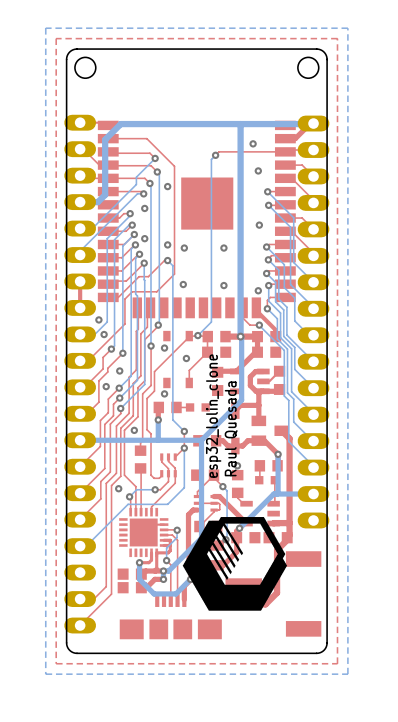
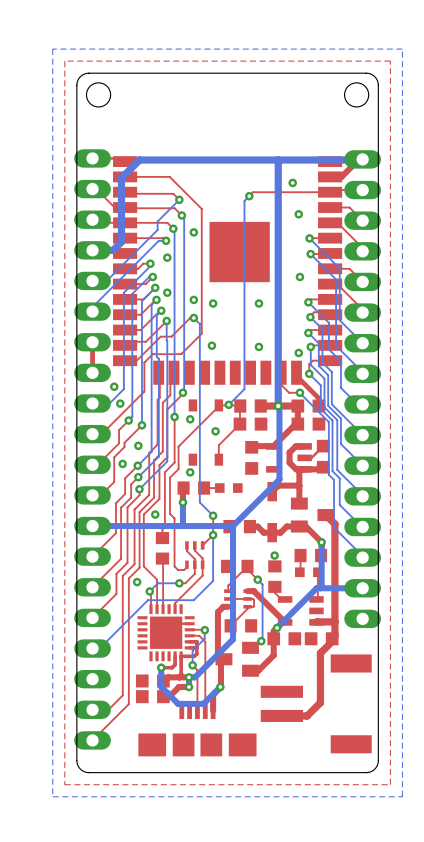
text: esp32_lolin_clone (213, 416) -> none
text: Raul Quesada (231, 428) -> none
drawing: [182, 517, 288, 611] -> none

